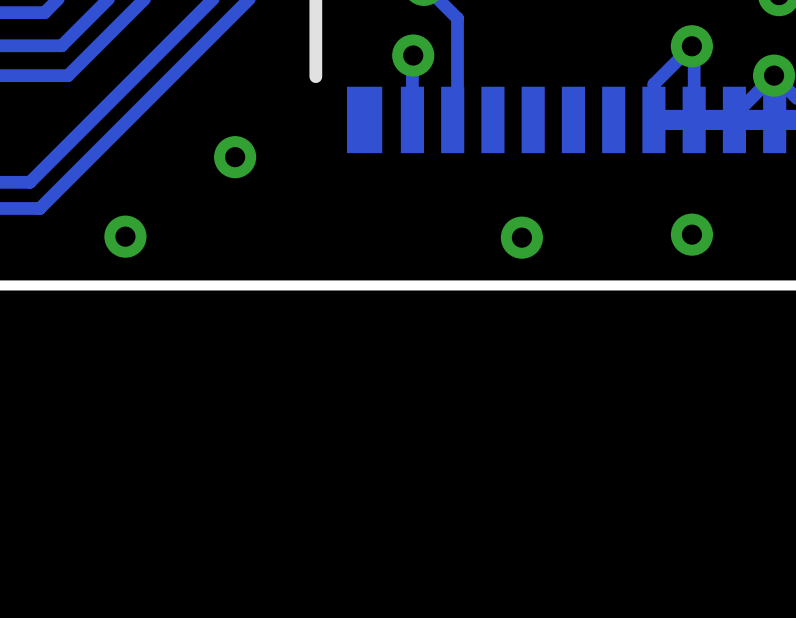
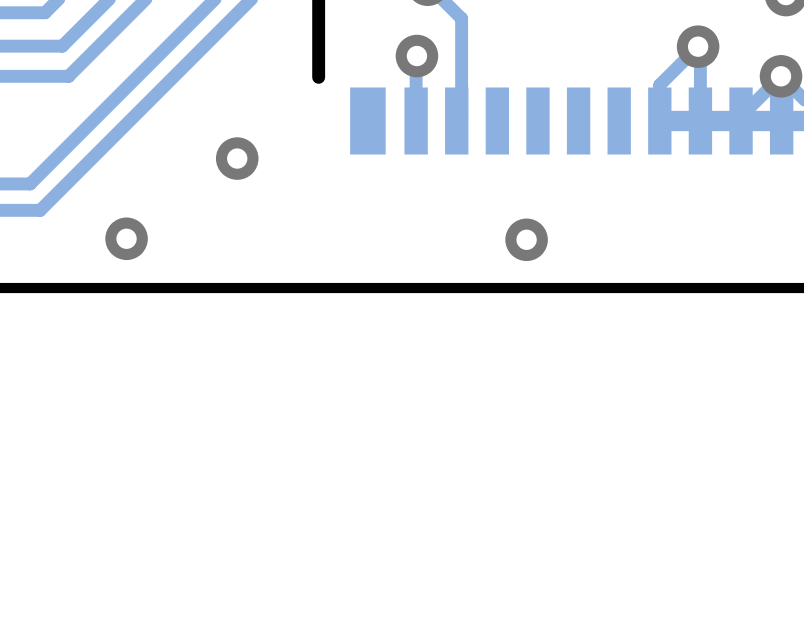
via: (691, 234) -> none

